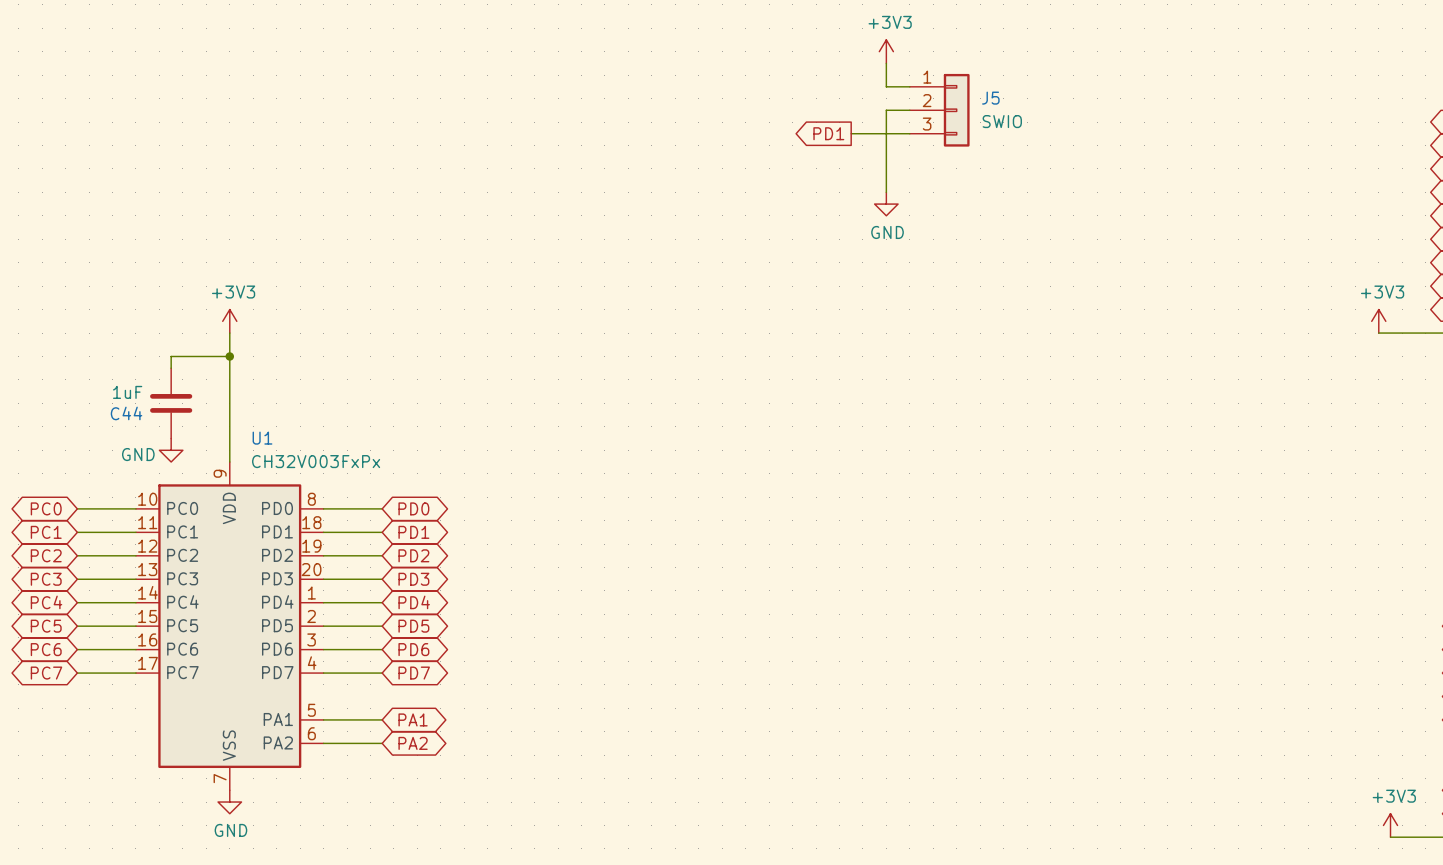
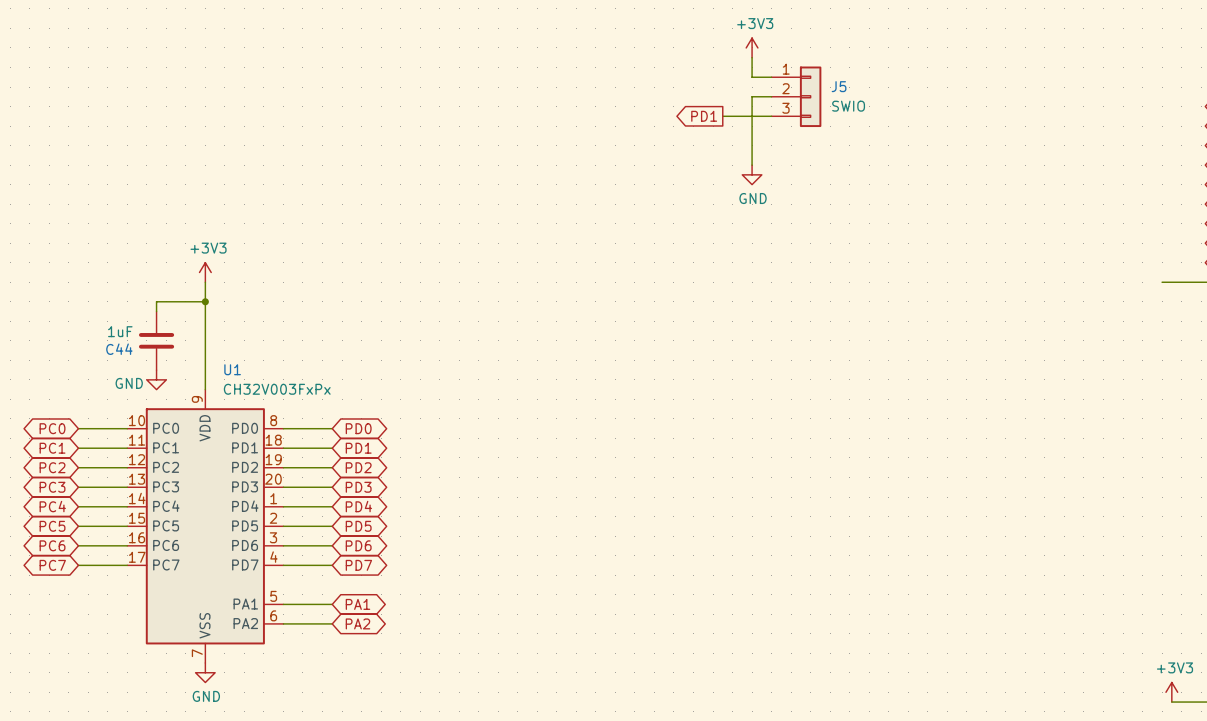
power symbol: +3V3 (1378, 321) -> none

